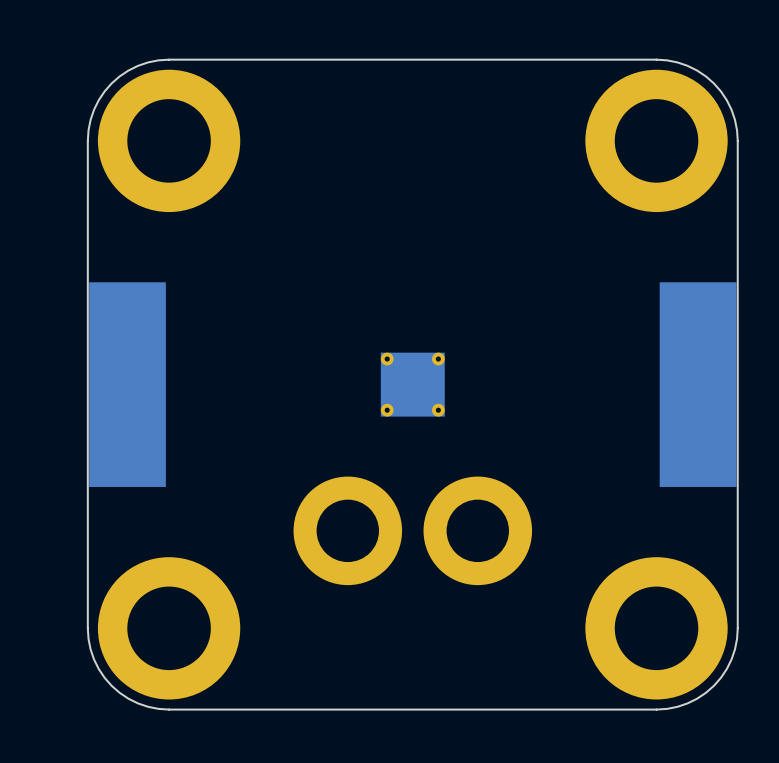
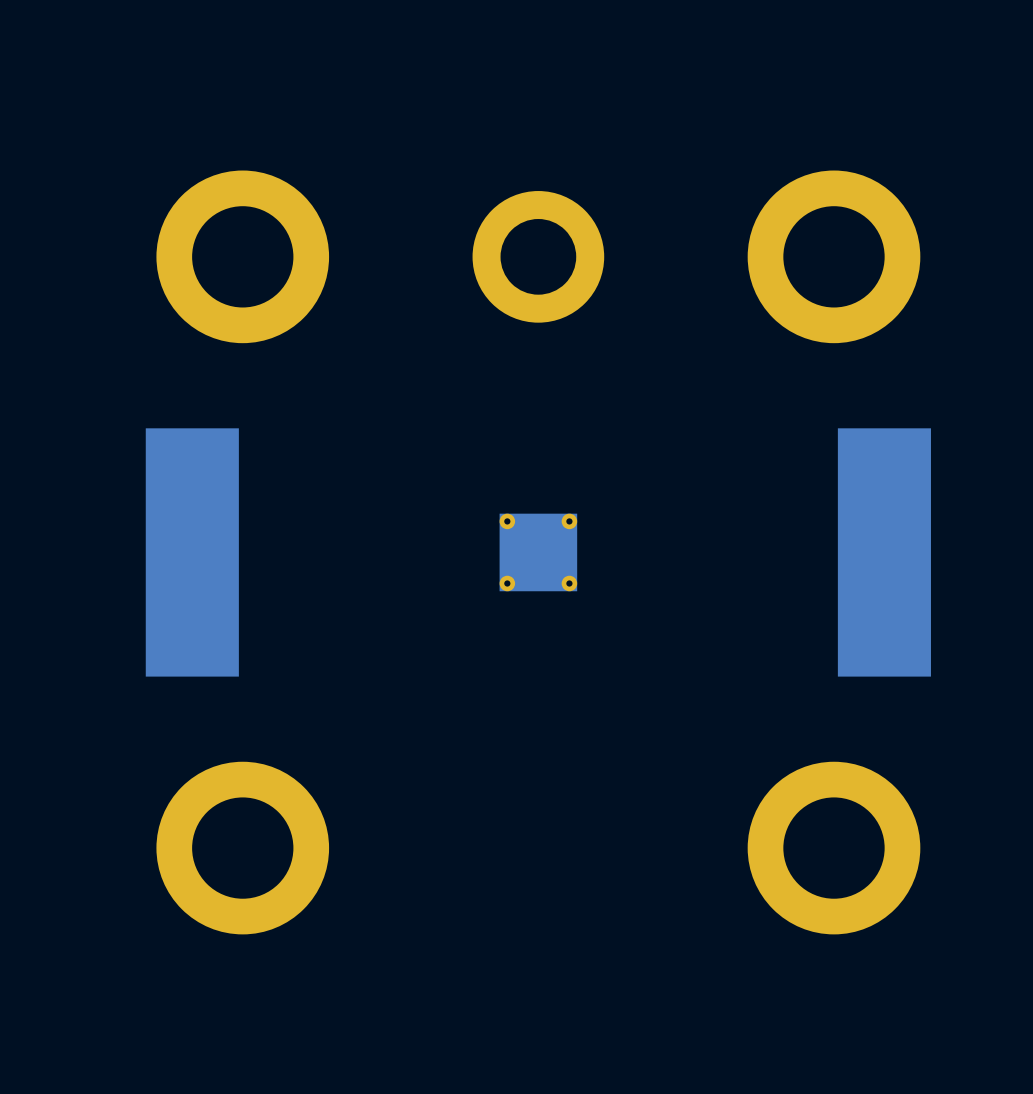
board edge: (656, 59) (169, 59) (148, 62) (128, 70) (104, 91) (94, 109) (87, 140) (87, 628) (90, 649) (98, 668) (119, 692) (137, 703) (169, 709) (656, 709) (677, 706) (697, 698) (720, 677) (734, 649) (737, 628) (737, 130) (726, 100) (713, 83) (687, 65) (656, 59) -> none
part: none -> (538, 256)
part: (347, 530) -> none
part: (477, 530) -> none

